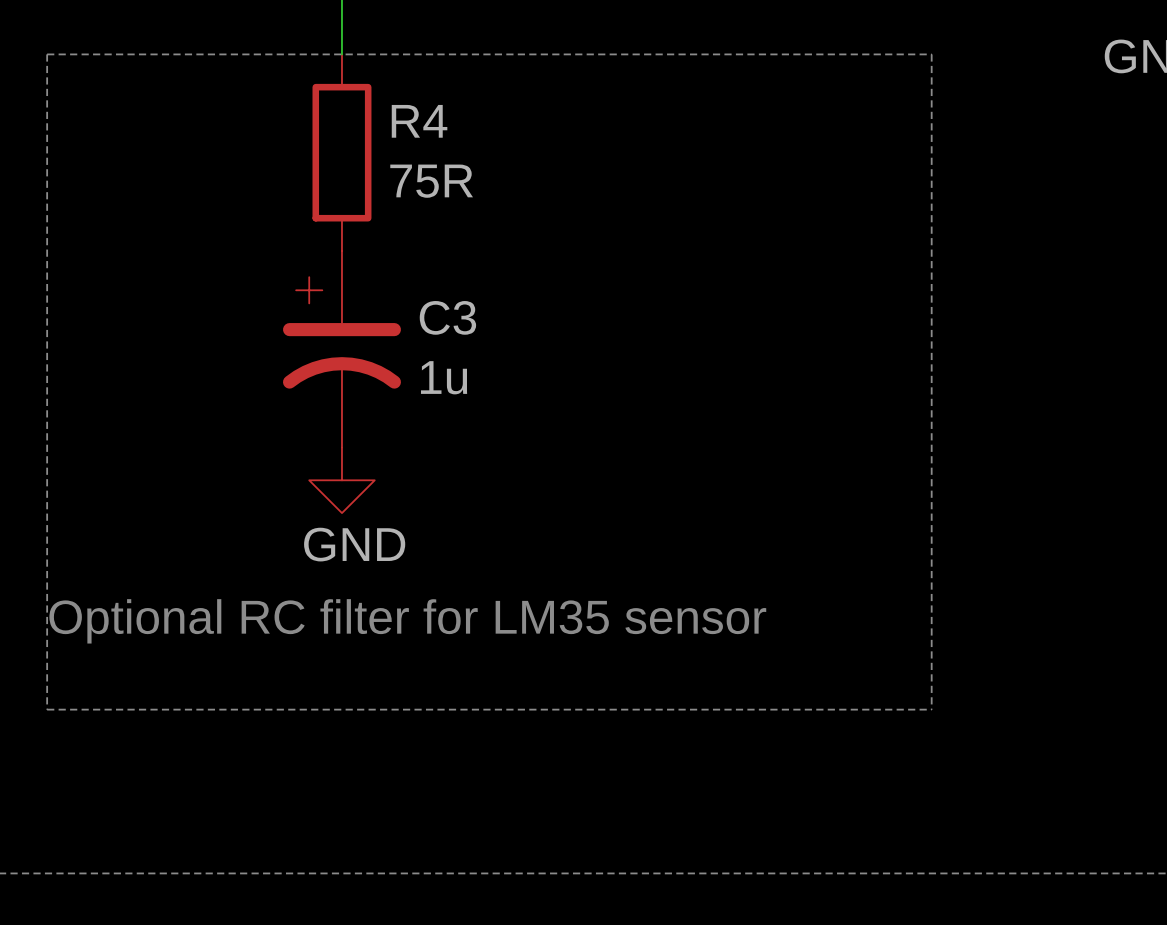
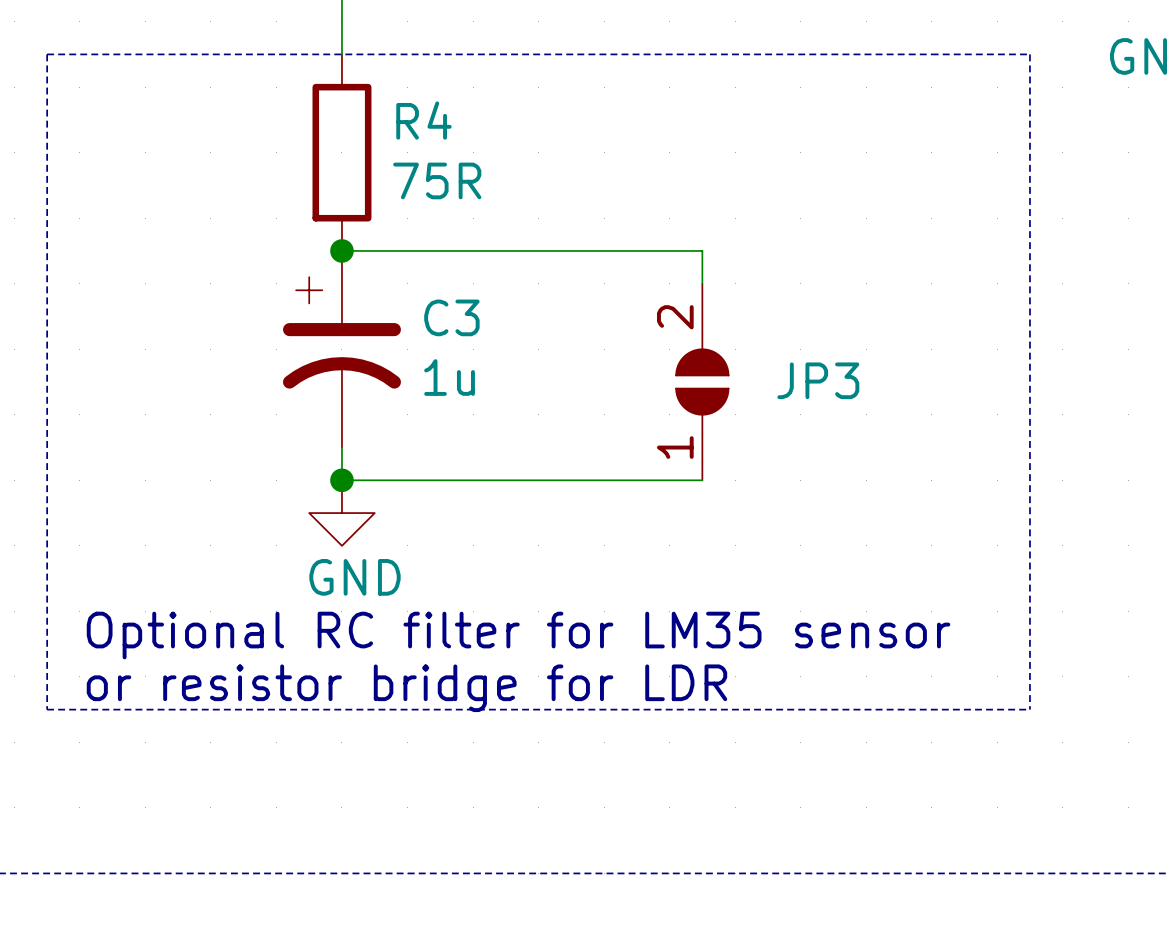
line: (931, 54) (931, 709) -> (931, 54) (1029, 54) (1029, 709) (931, 709)
wire: none -> (341, 250) (702, 250) (702, 283)
junction: none -> (341, 250)
JP3: none -> (702, 382)
wire: none -> (341, 447) (341, 480) (702, 480)
power symbol position: GND (341, 480) -> GND (341, 513)
junction: none -> (341, 480)
text position: Optional RC filter for LM35 sensor (407, 621) -> Optional RC filter for LM35 sensor (518, 635)
text: none -> or resistor bridge for LDR (406, 688)

